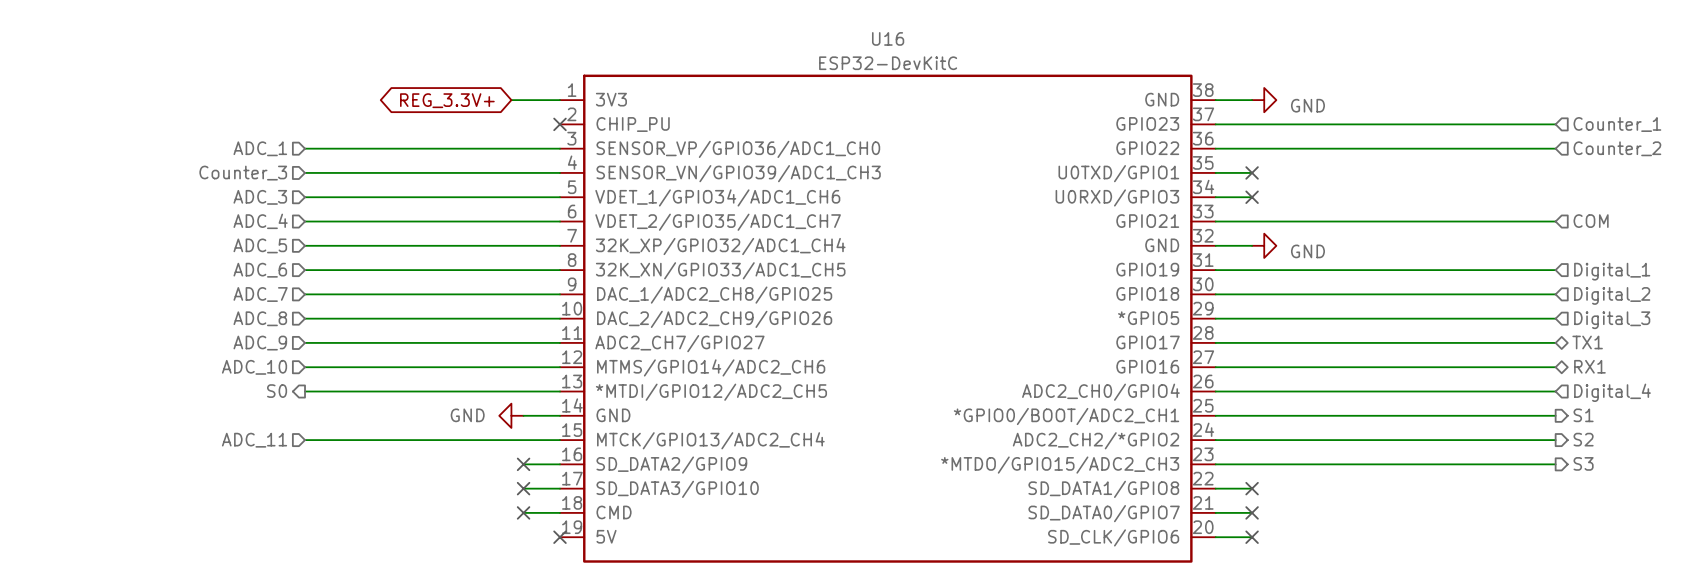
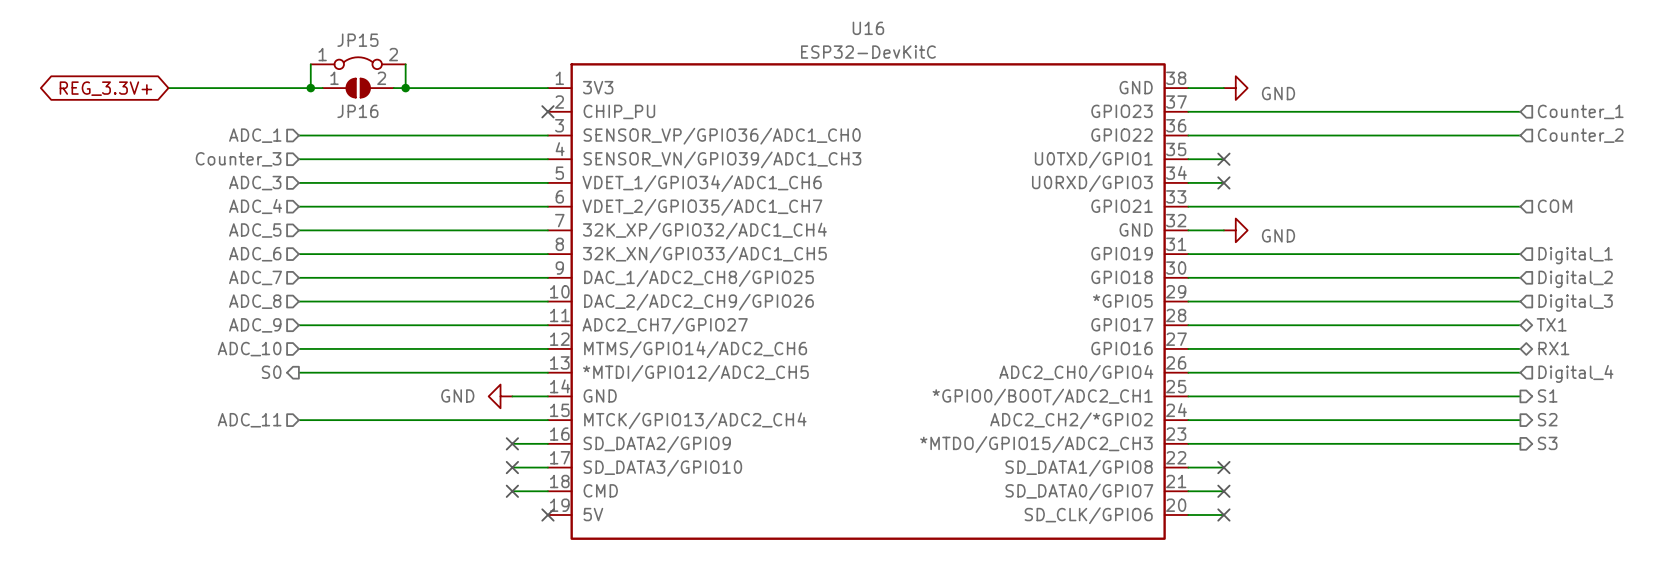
JP15: none -> (358, 63)
wire: none -> (310, 64) (310, 88)
wire: none -> (405, 64) (405, 88)
global label: none -> REG_3.3V+ (105, 88)
wire: none -> (168, 88) (322, 88)
junction: none -> (310, 88)
JP16: none -> (358, 88)
wire: none -> (393, 88) (500, 88)
junction: none -> (405, 88)
global label: REG_3.3V+ (447, 100) -> none

